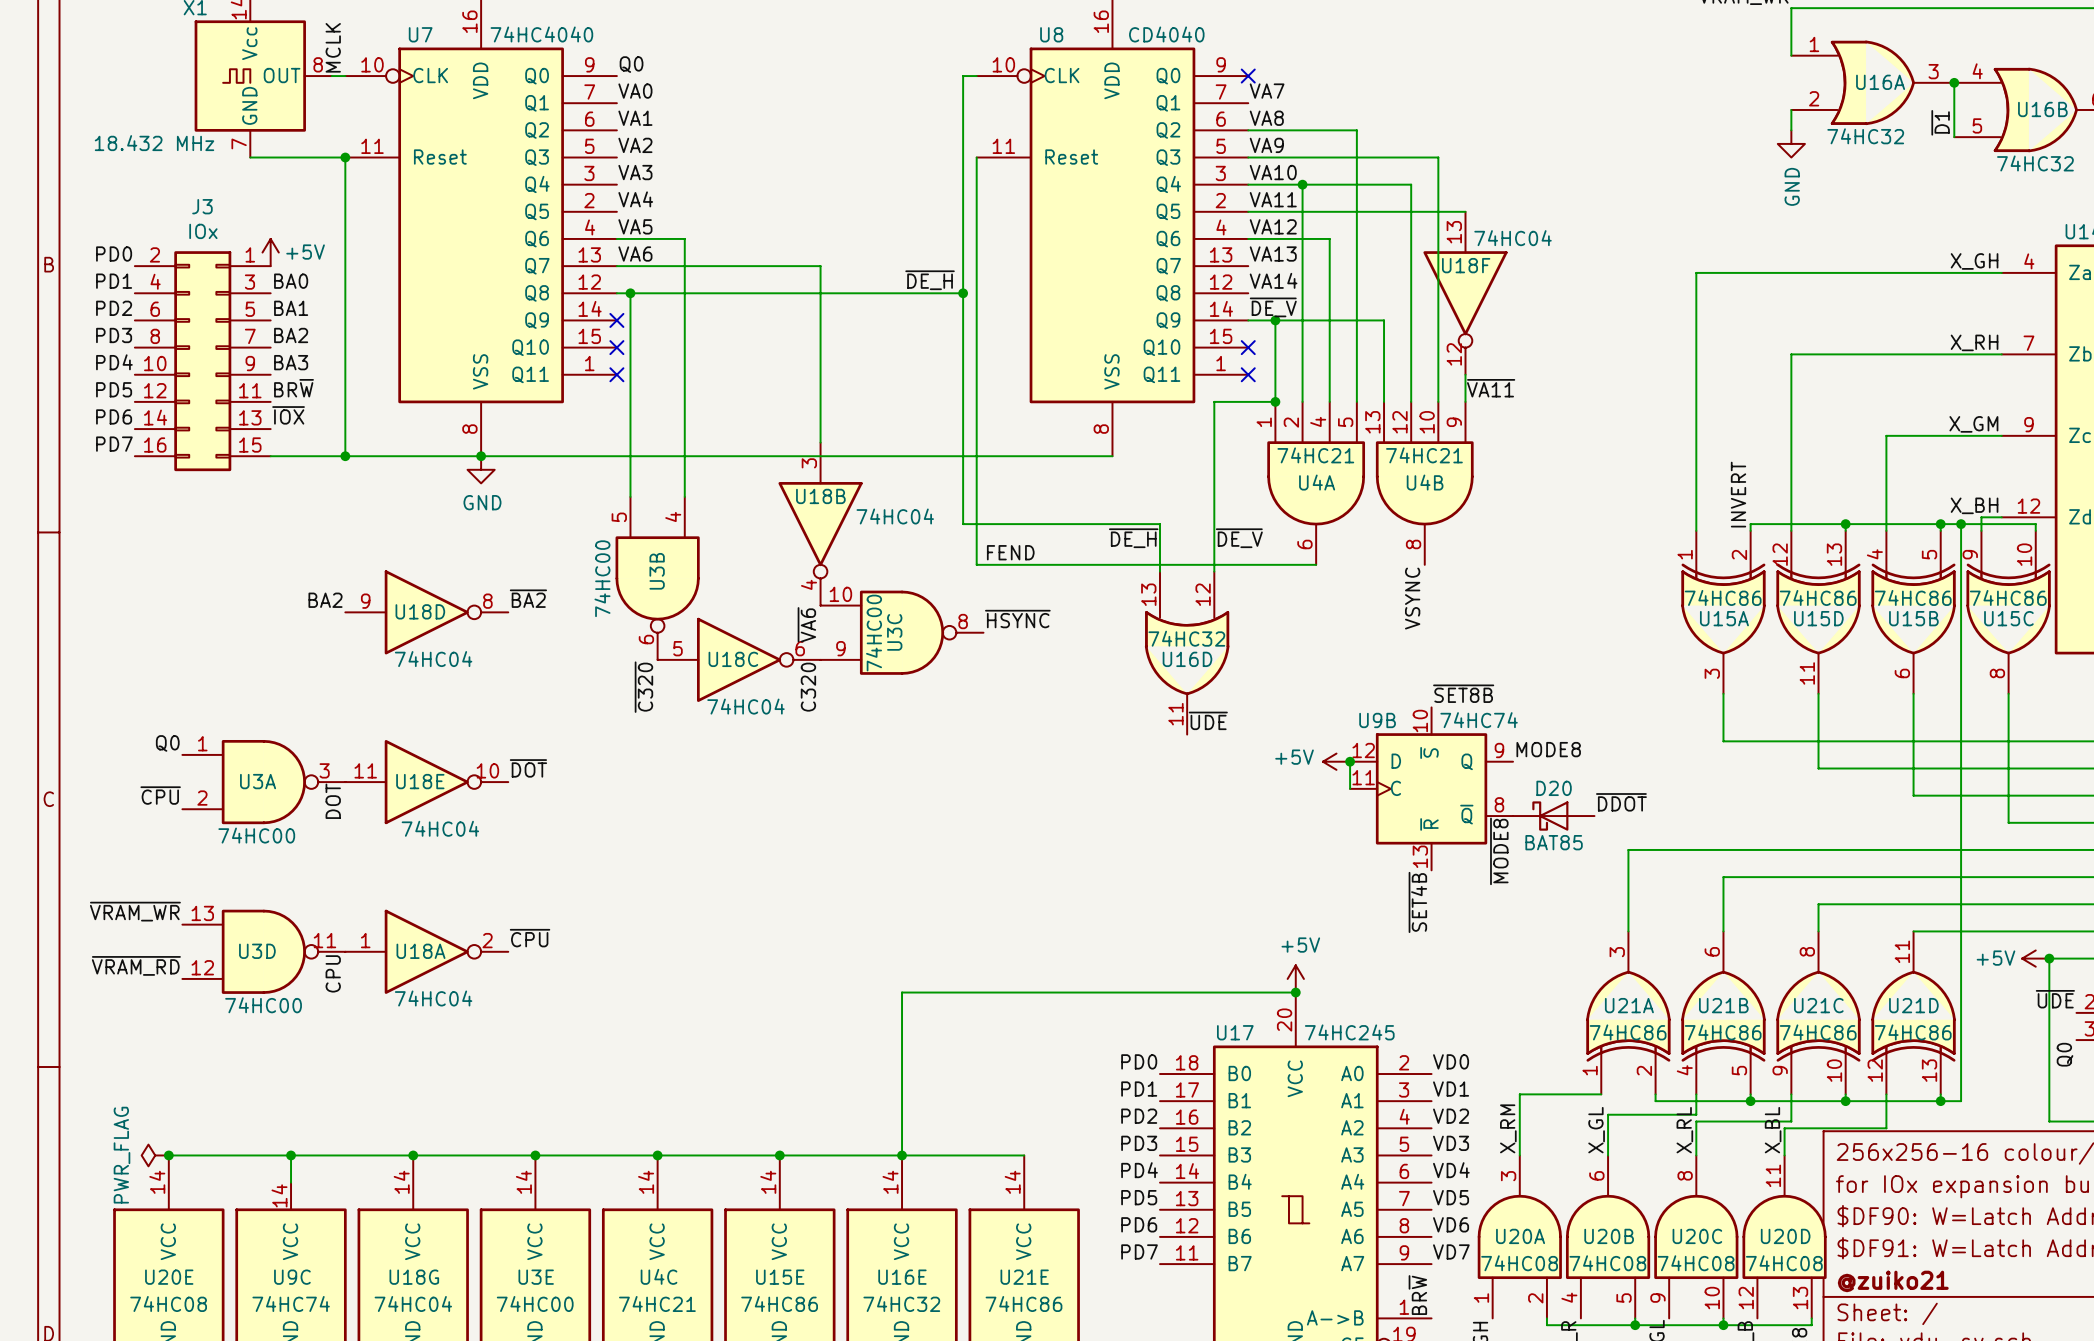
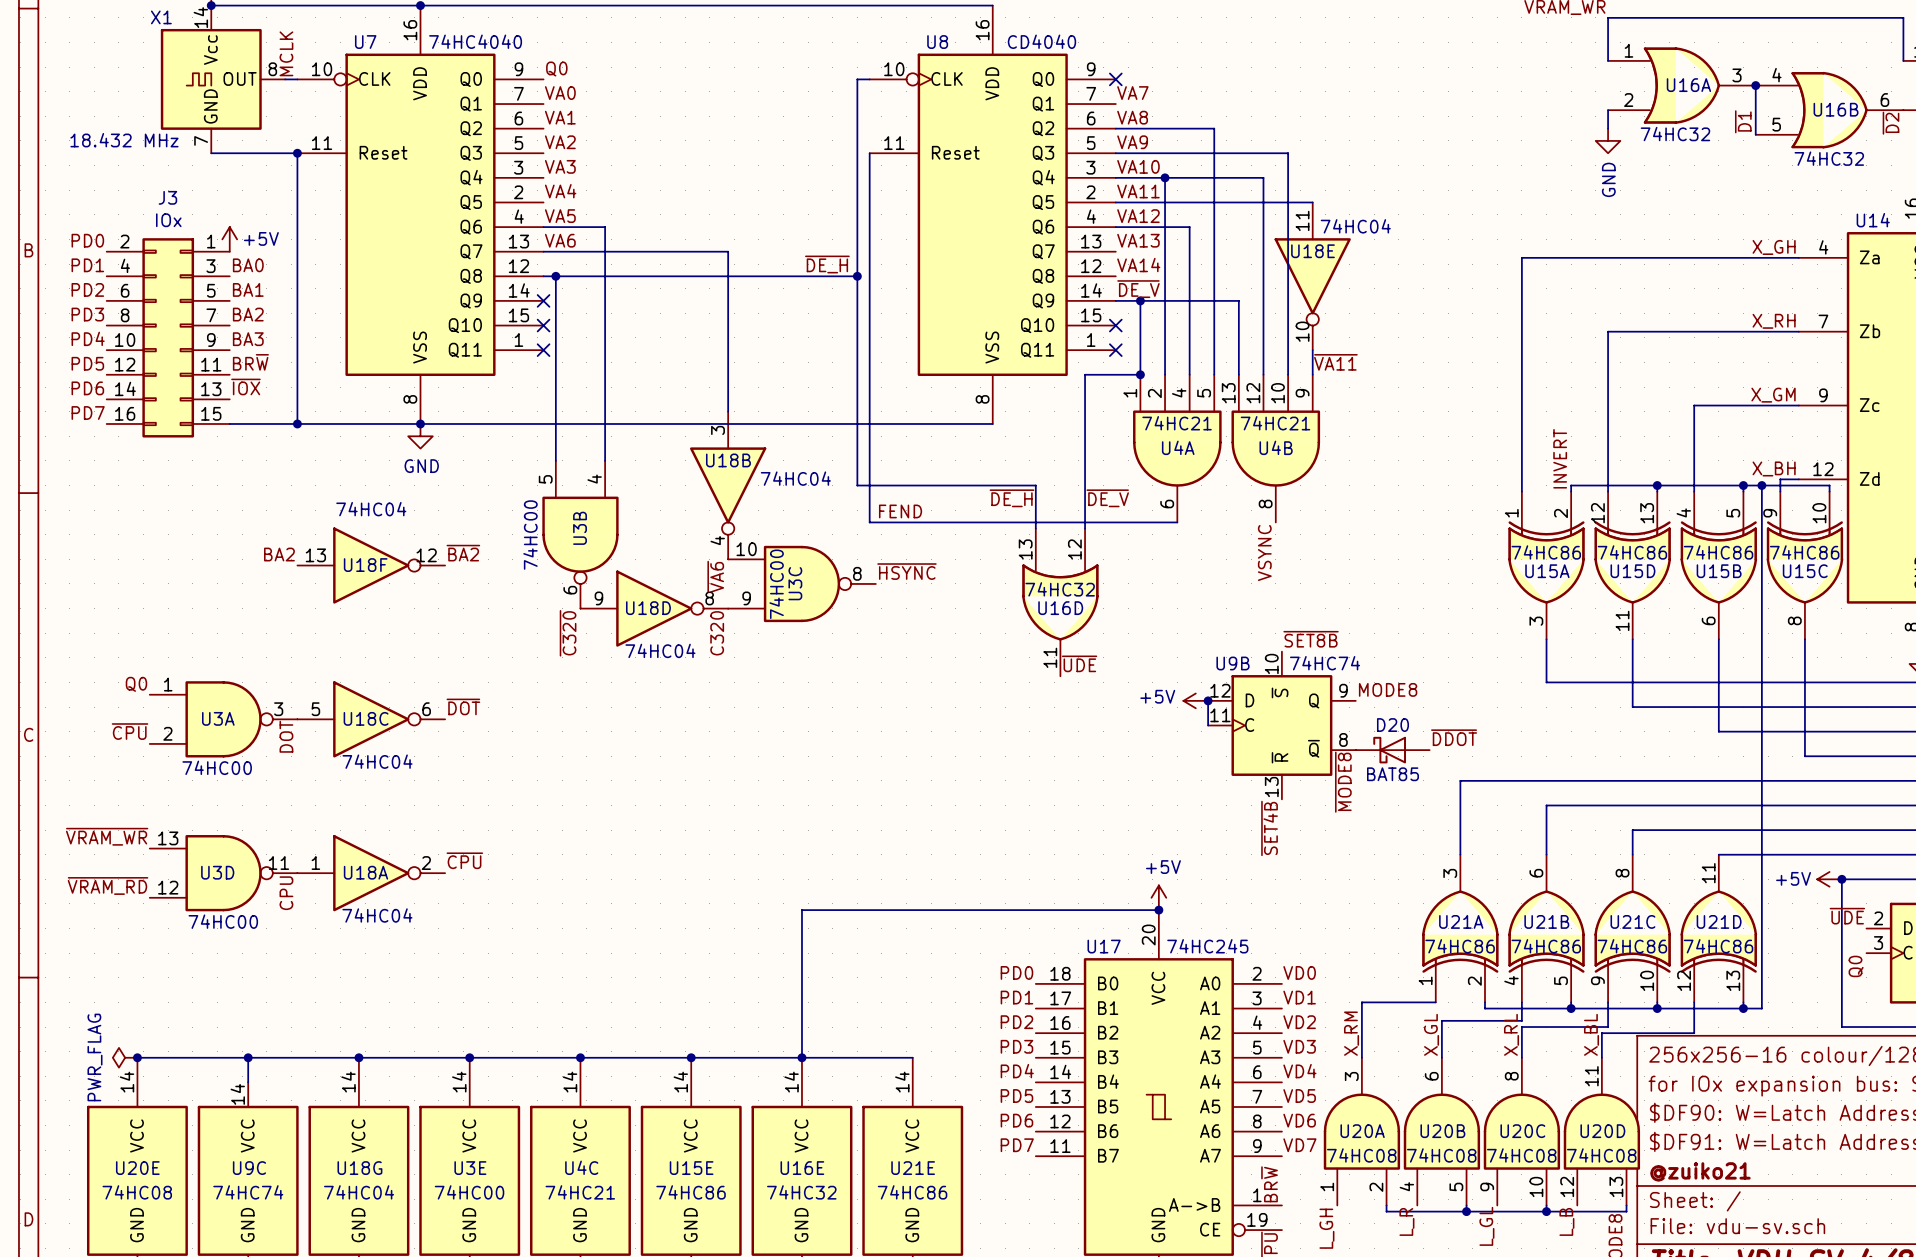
U18F value position: 74HC04 (1513, 238) -> 74HC04 (371, 509)
U18F rotation: 0° (1465, 293) -> 90° counterclockwise (371, 565)
U18F position: (1465, 293) -> (371, 565)
U18D position: (426, 612) -> (654, 608)
U18C position: (739, 659) -> (371, 719)
U18E rotation: 0° (426, 782) -> 90° clockwise (1312, 276)
U18E position: (426, 782) -> (1312, 276)
U18E value position: 74HC04 (440, 828) -> 74HC04 (1355, 226)

